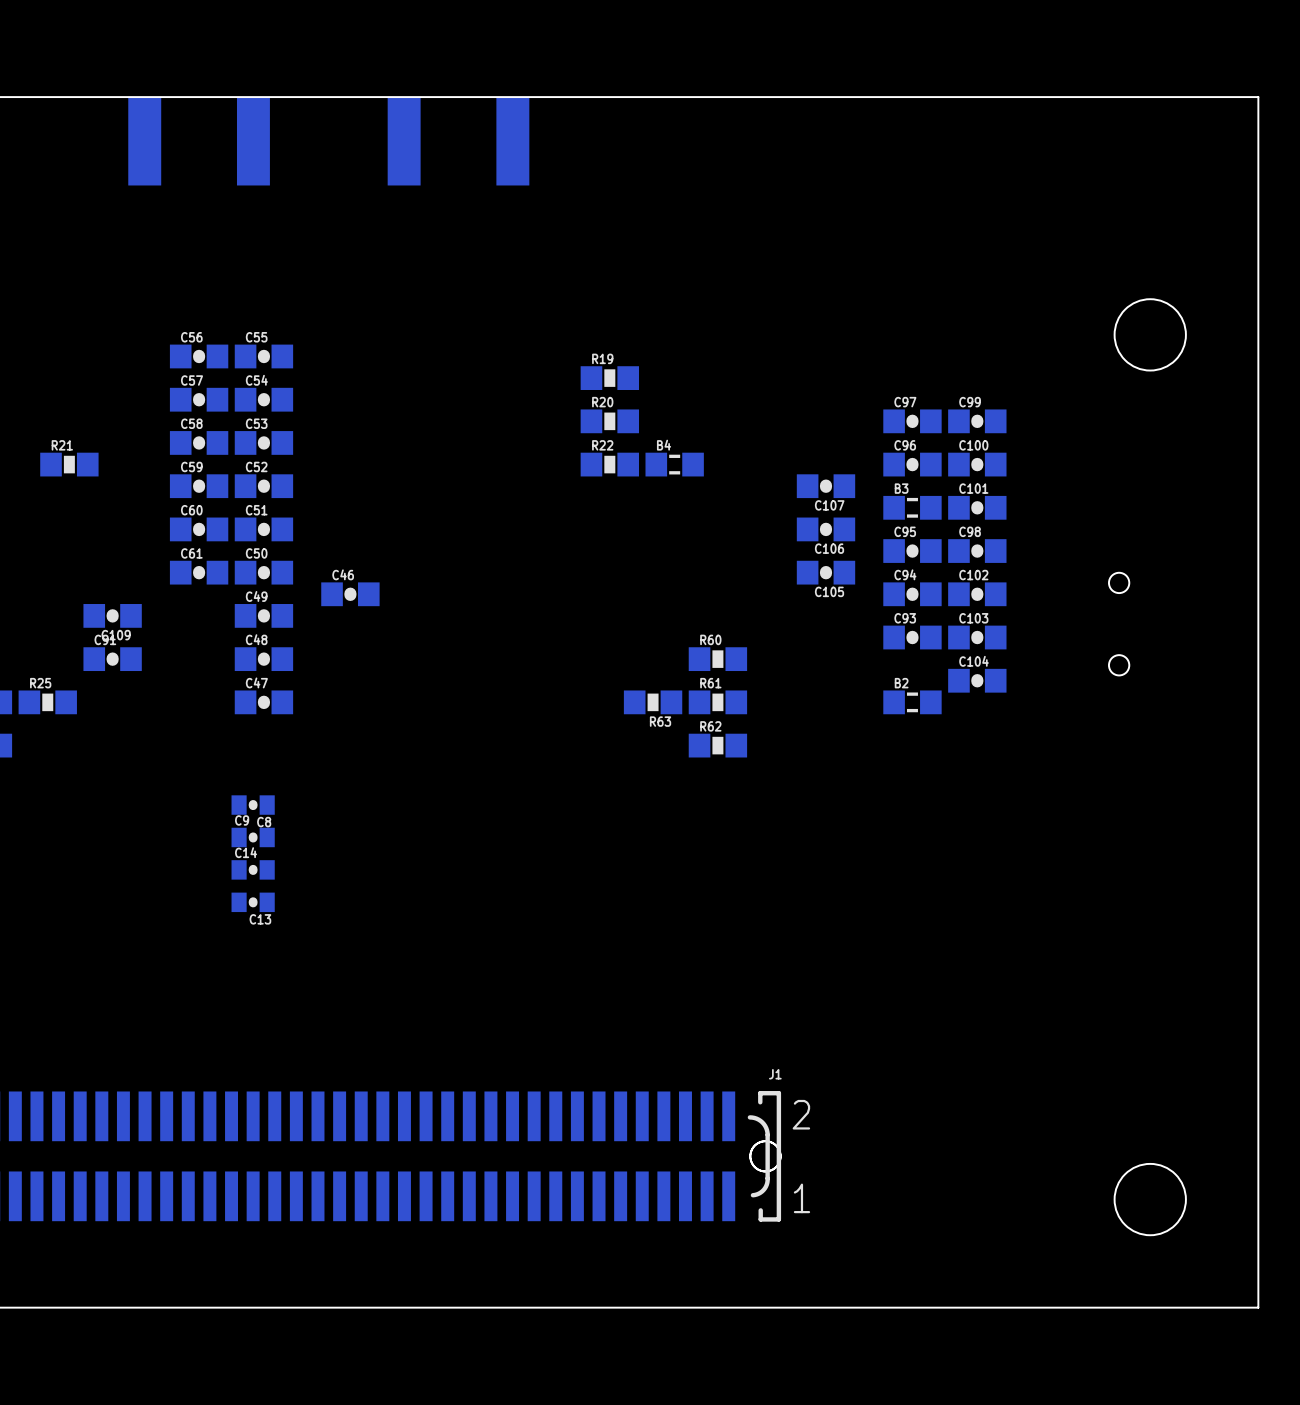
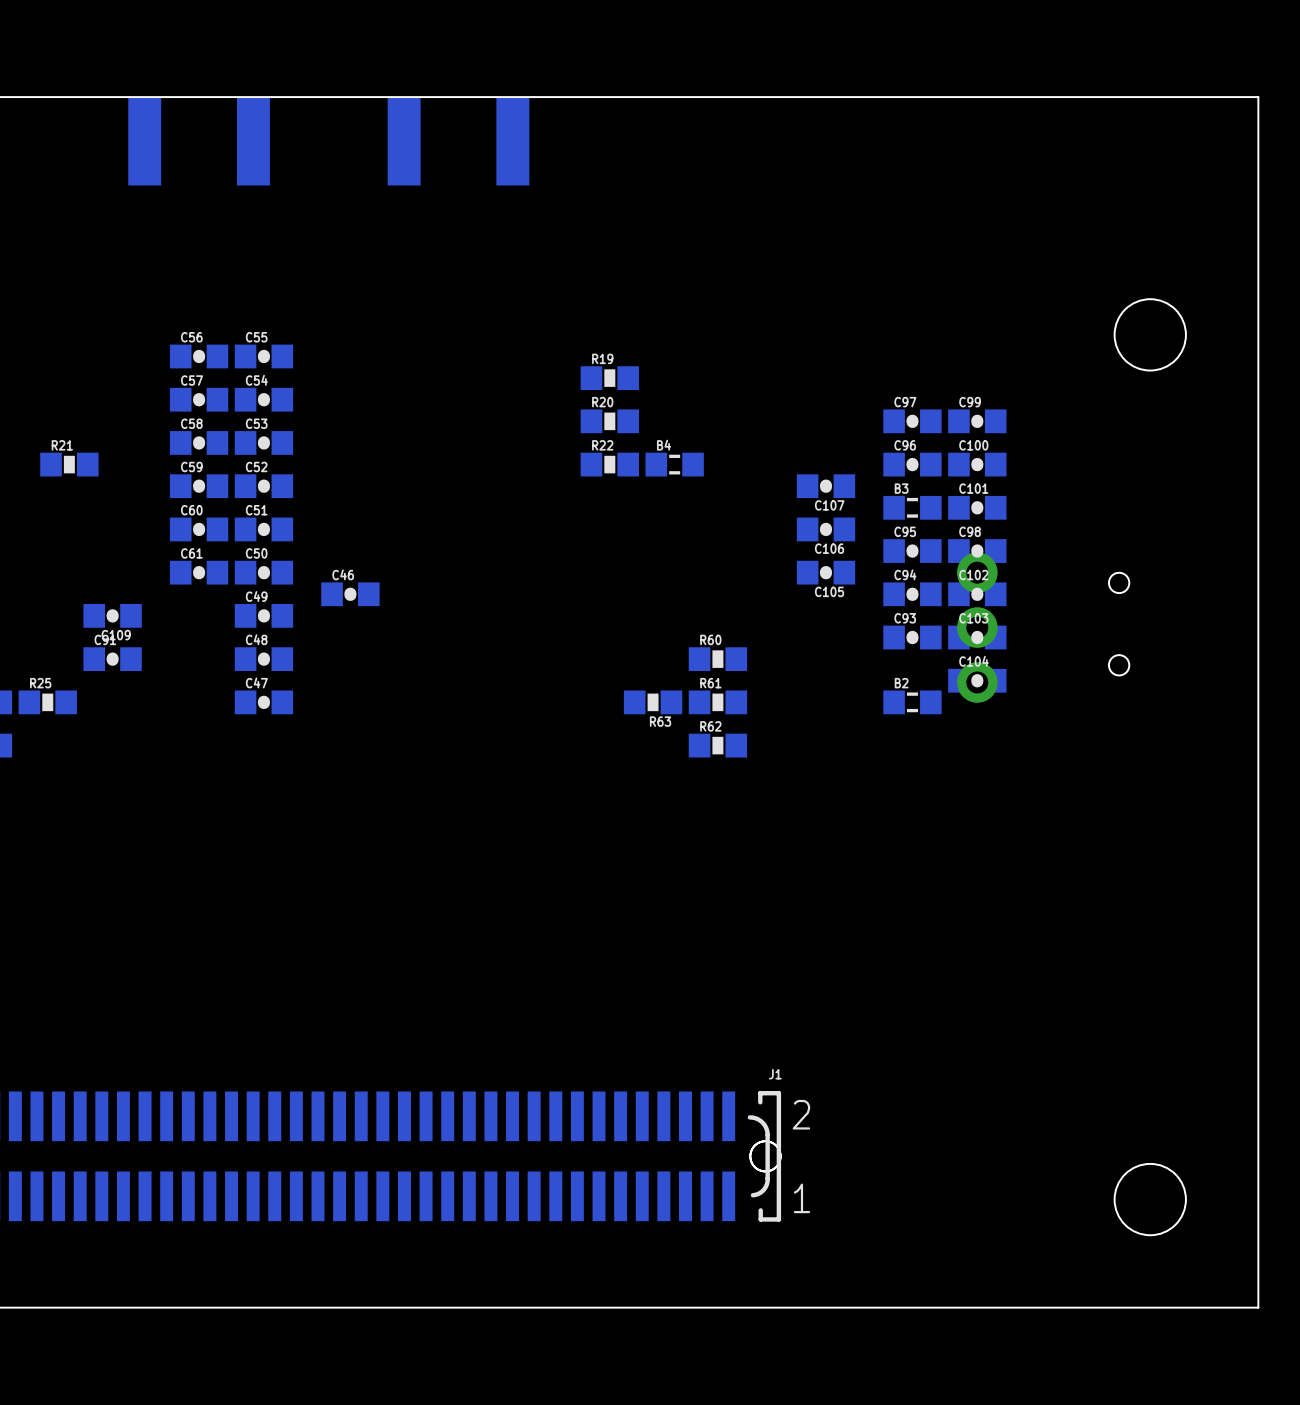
part: none -> (977, 627)
C8: (253, 805) -> none
C9: (253, 837) -> none
C14: (253, 869) -> none
C13: (253, 902) -> none

